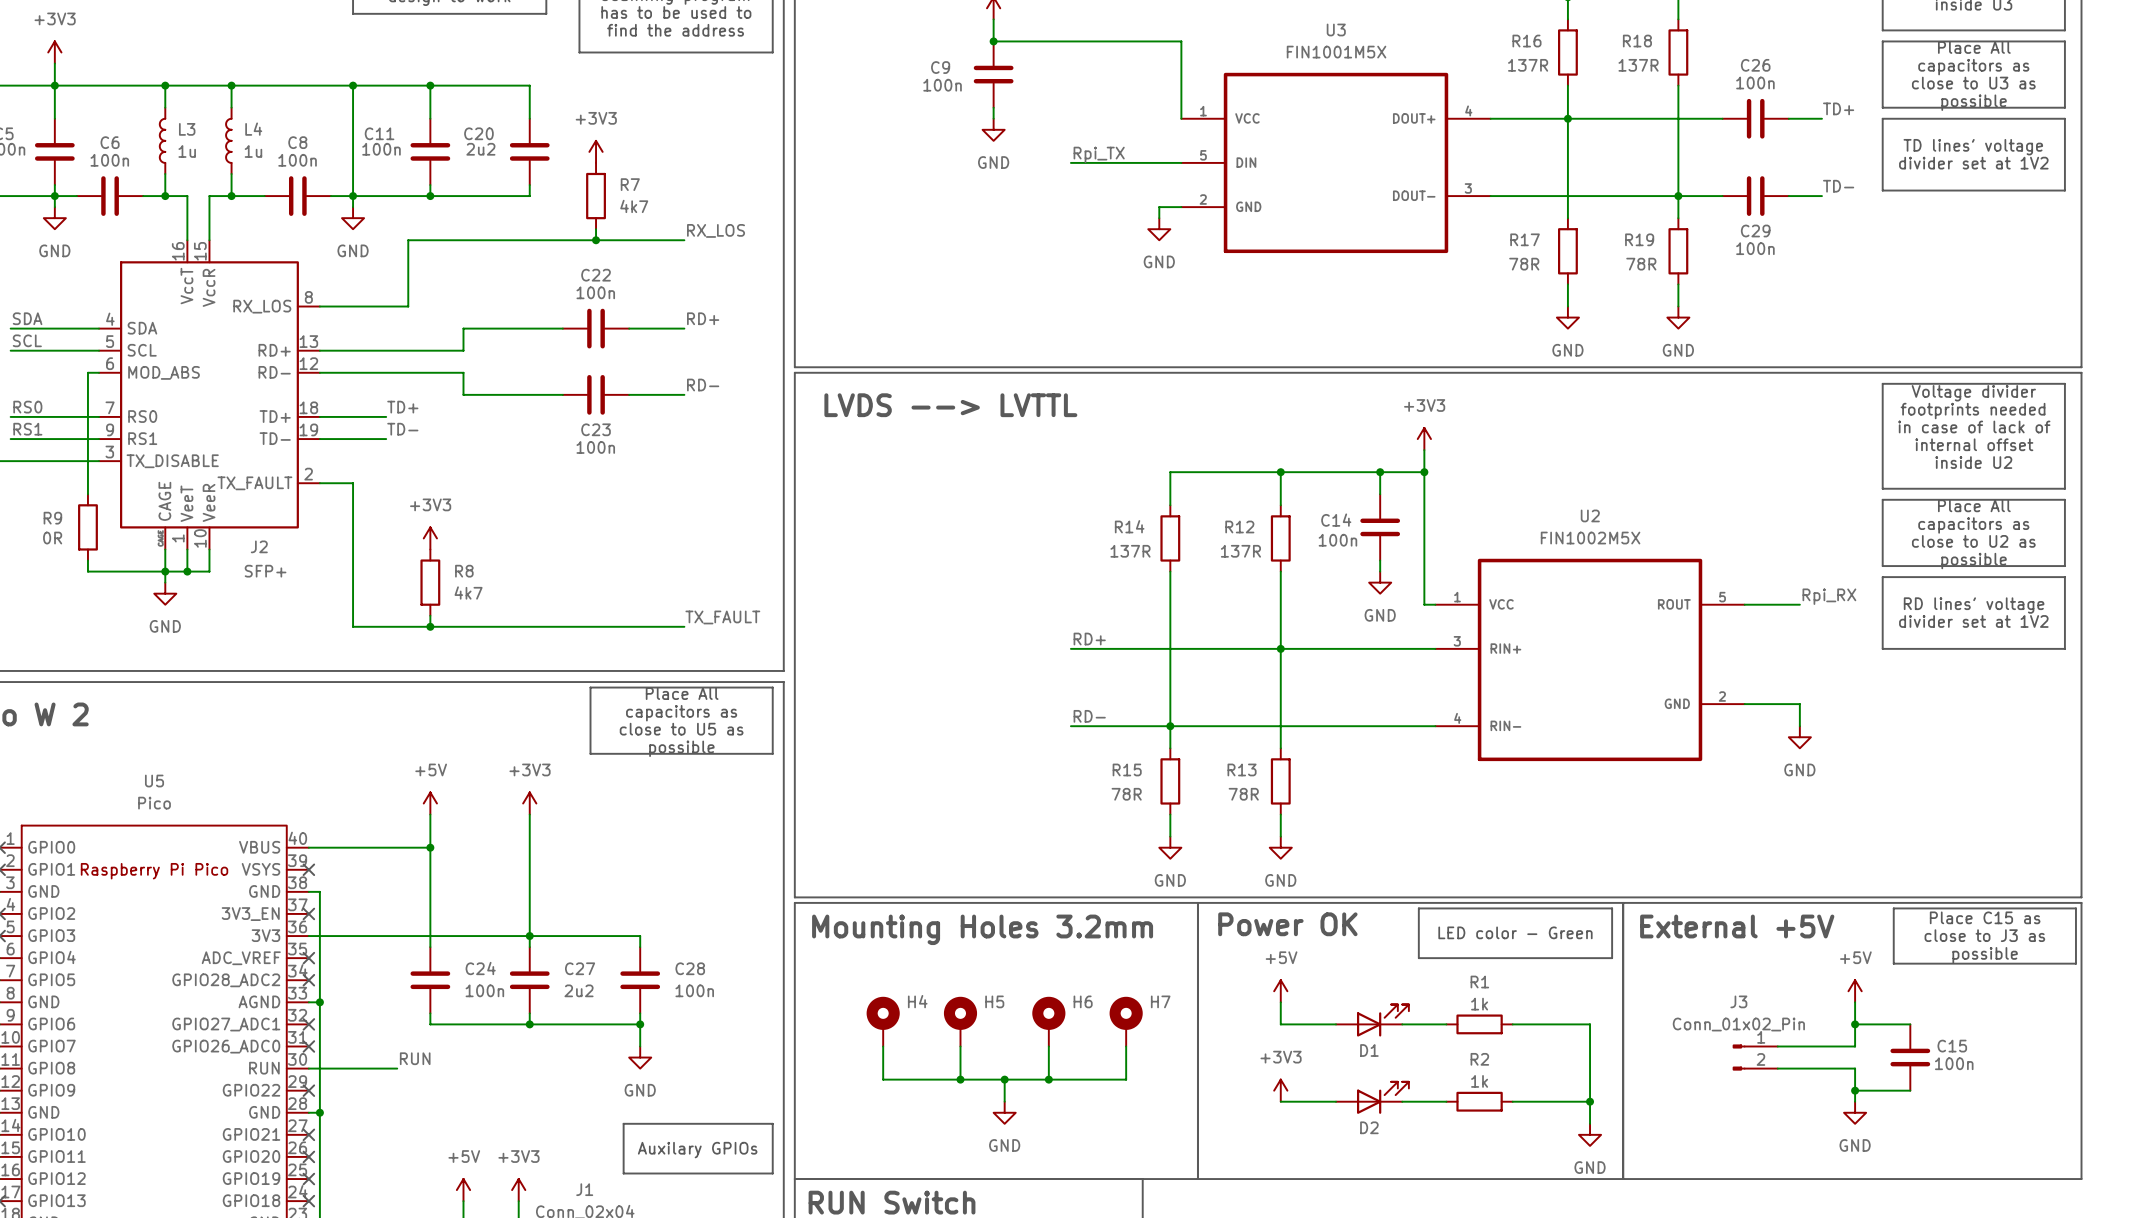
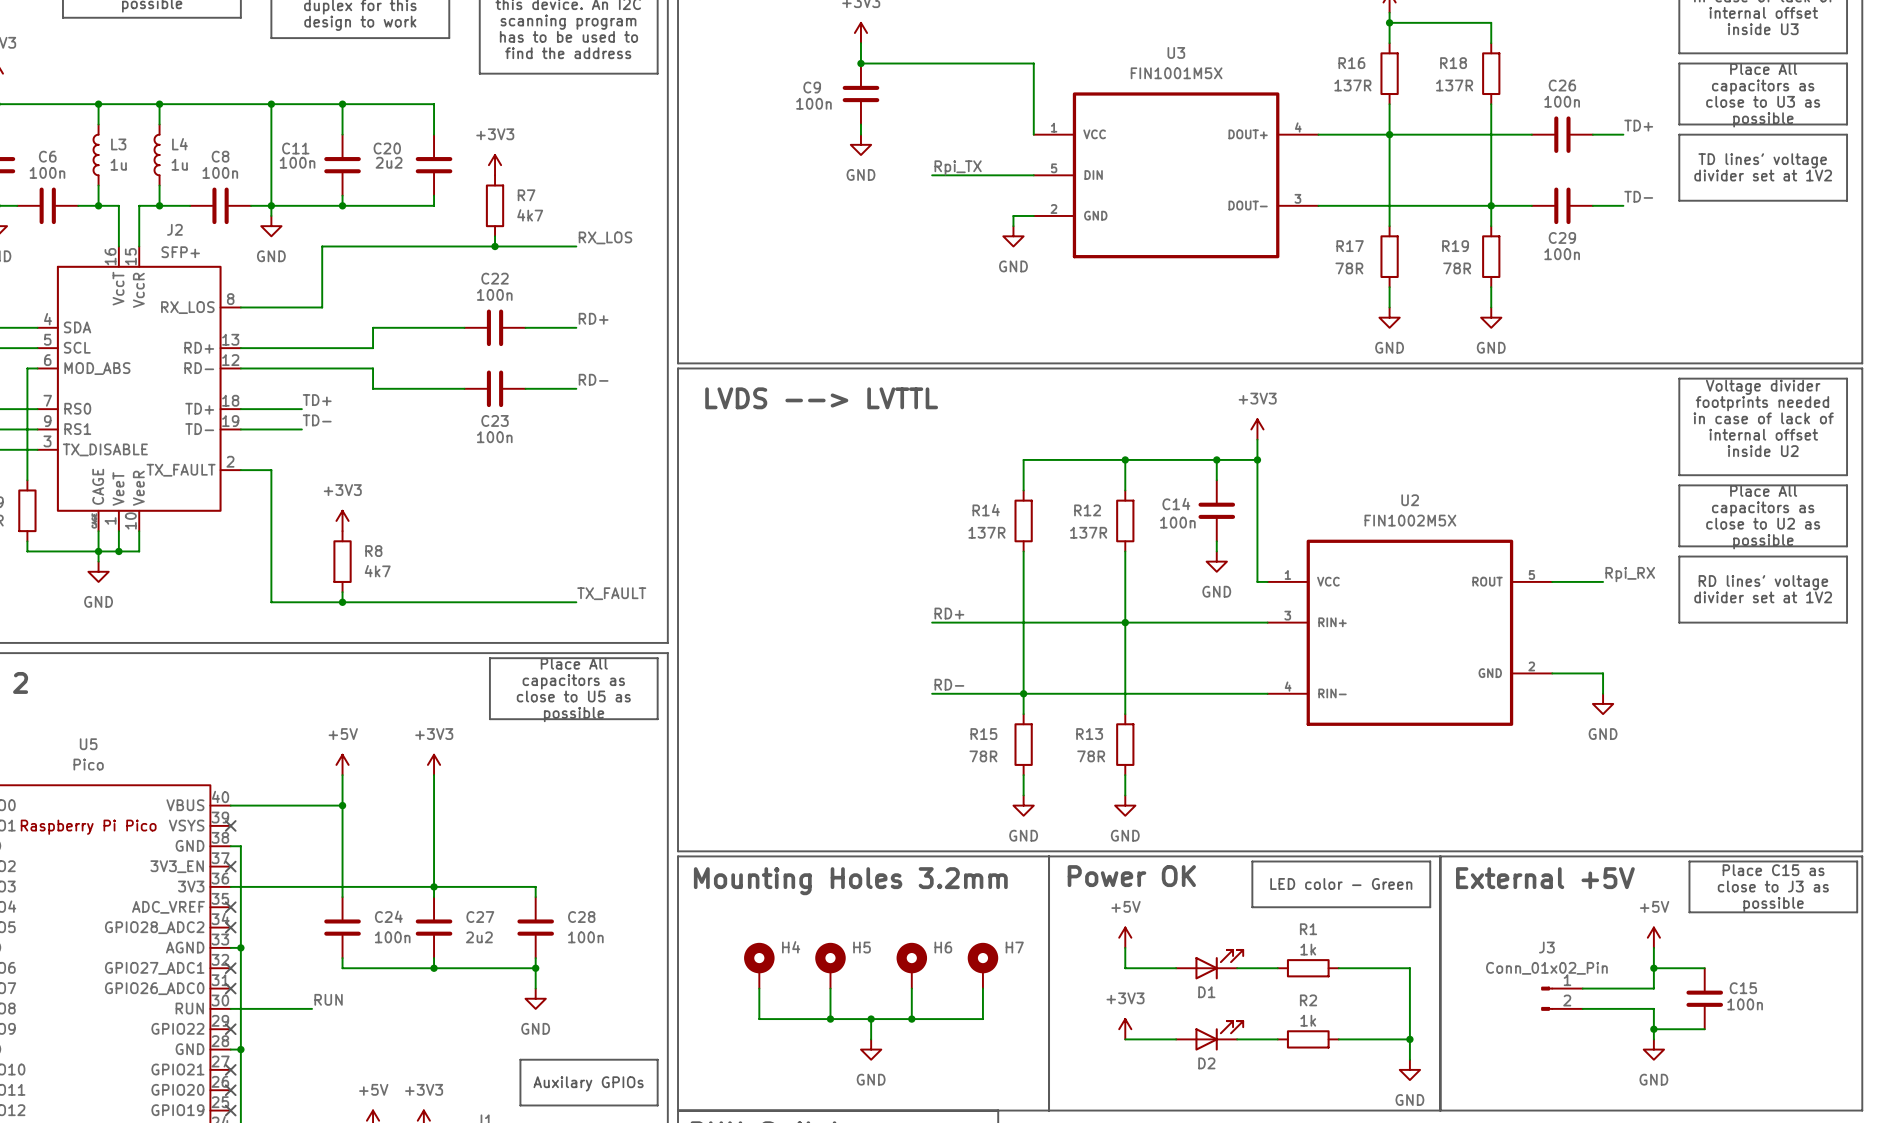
J2 name position: J2 (259, 546) -> J2 (174, 229)
J2 value position: SFP+ (265, 571) -> SFP+ (180, 252)

